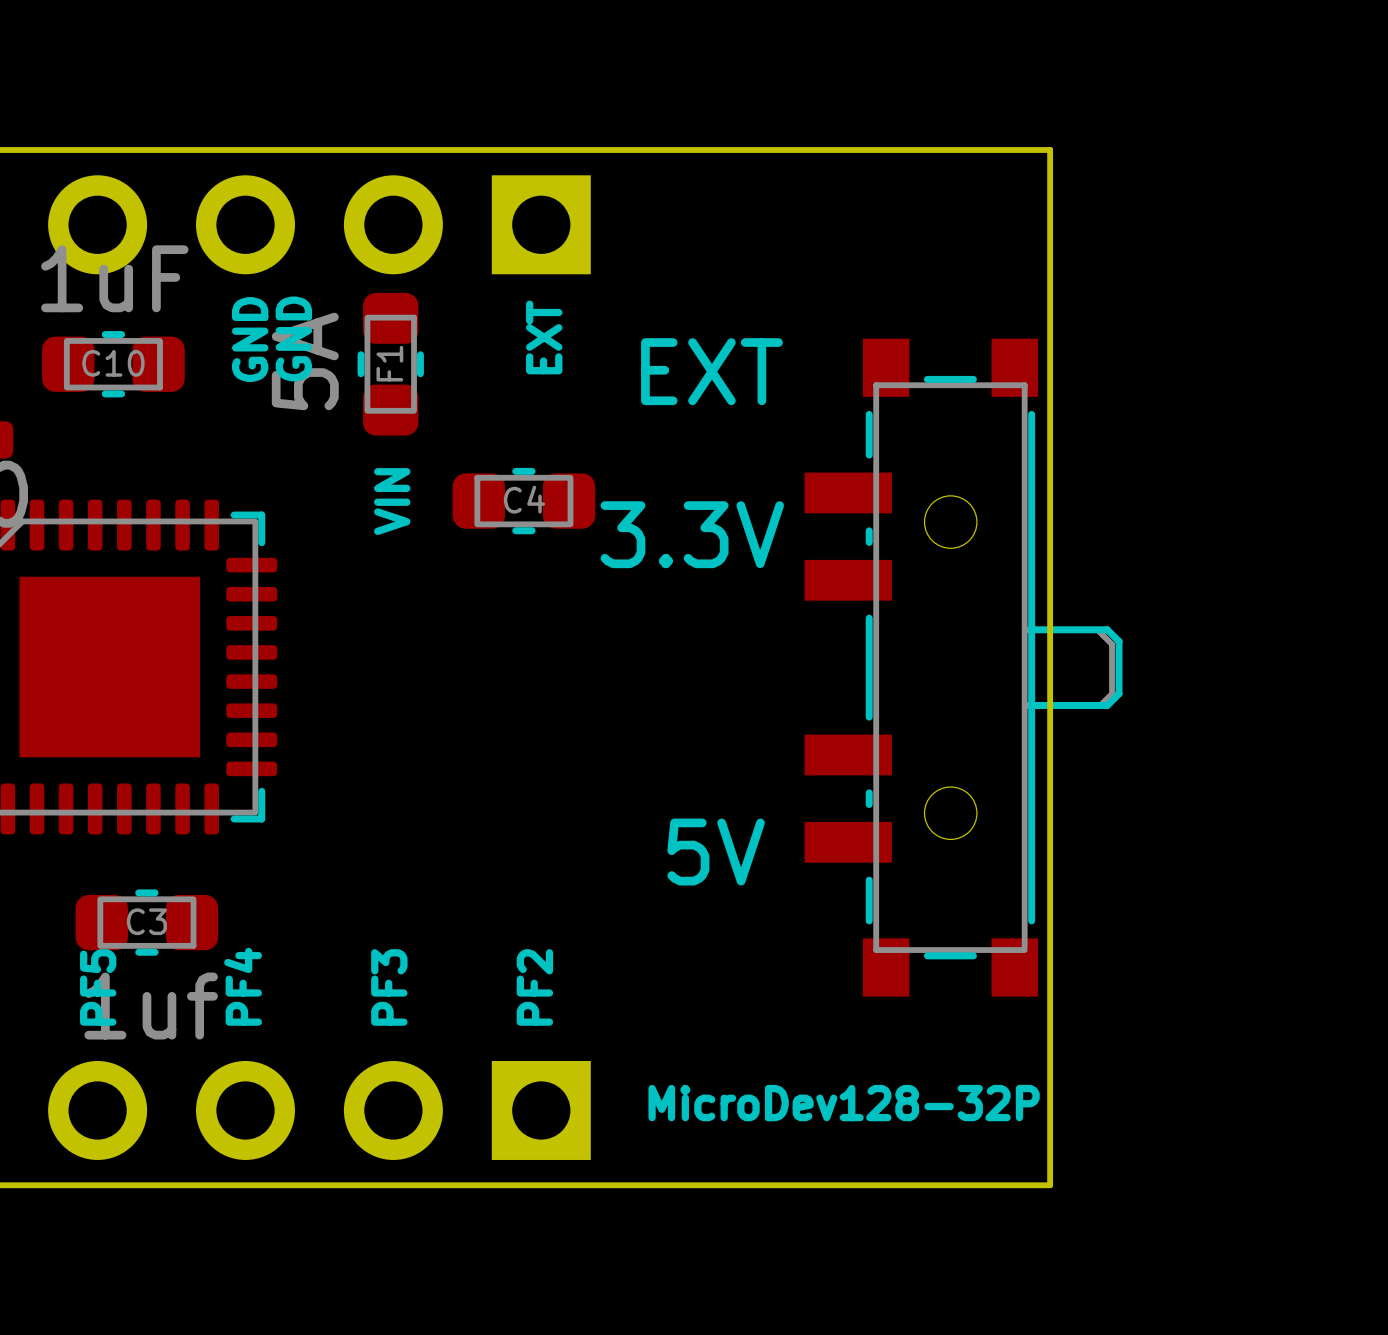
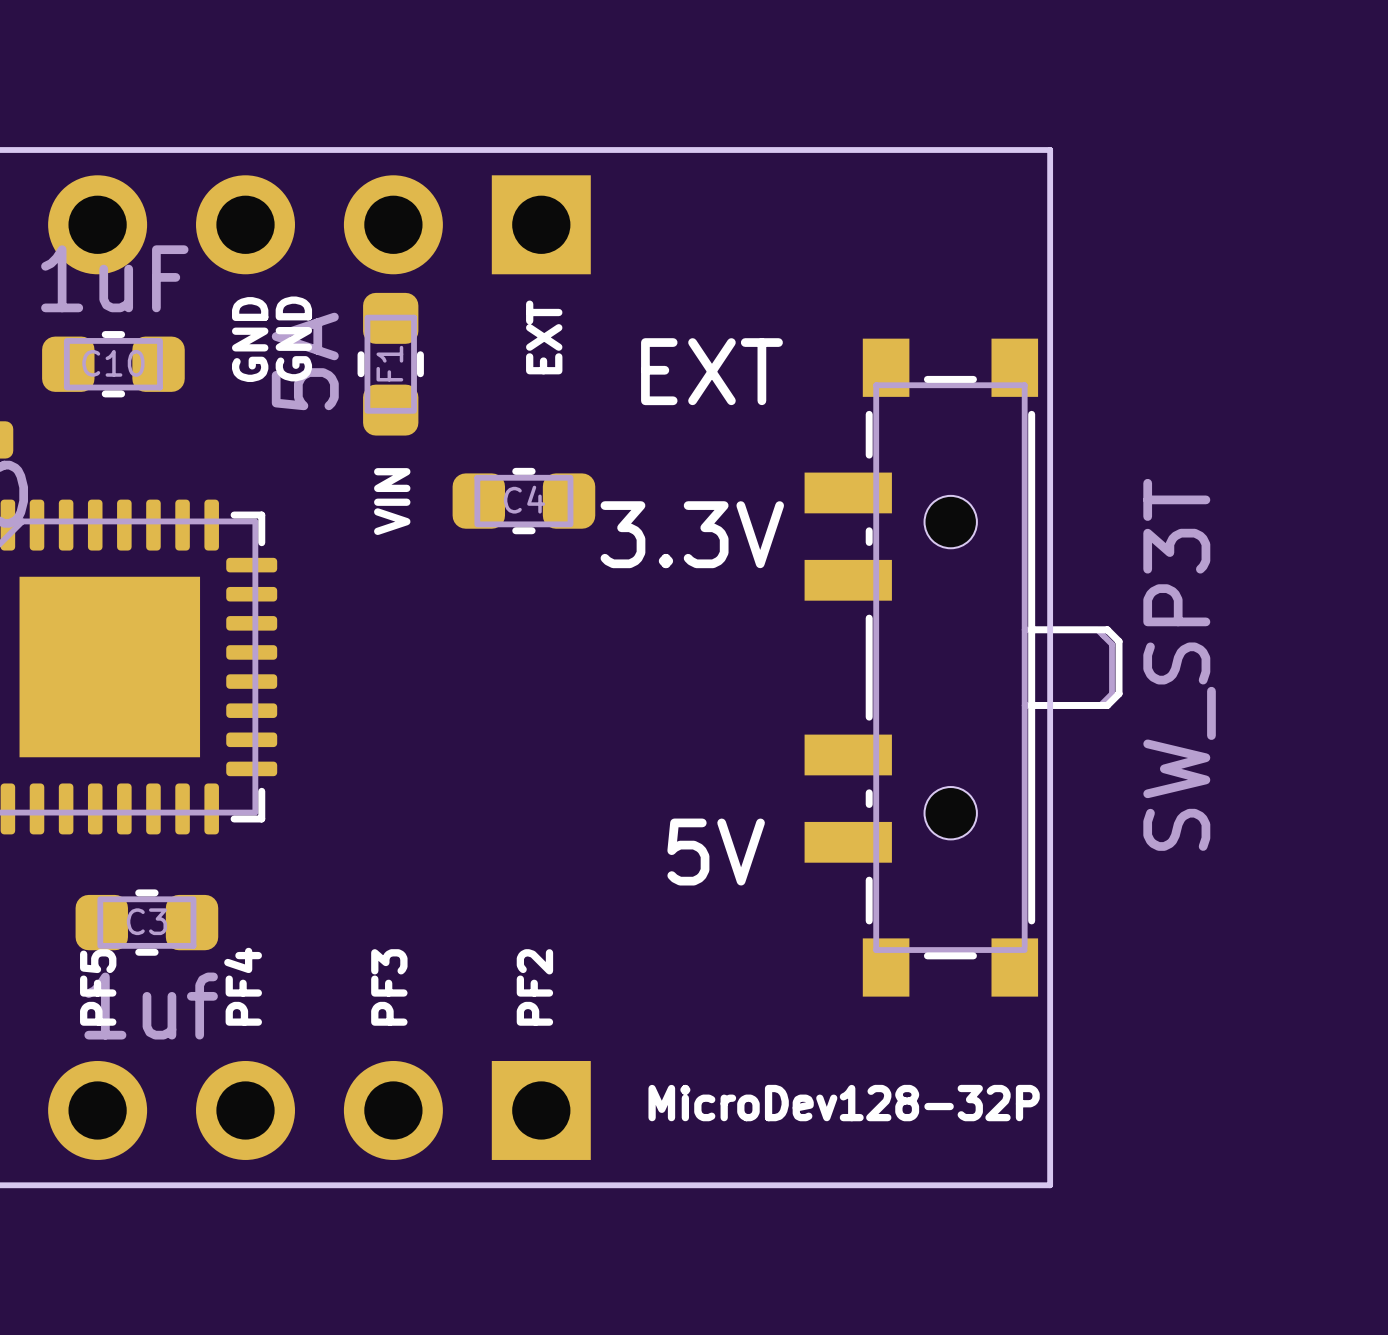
part value: none -> SW_SP3T (1179, 664)

